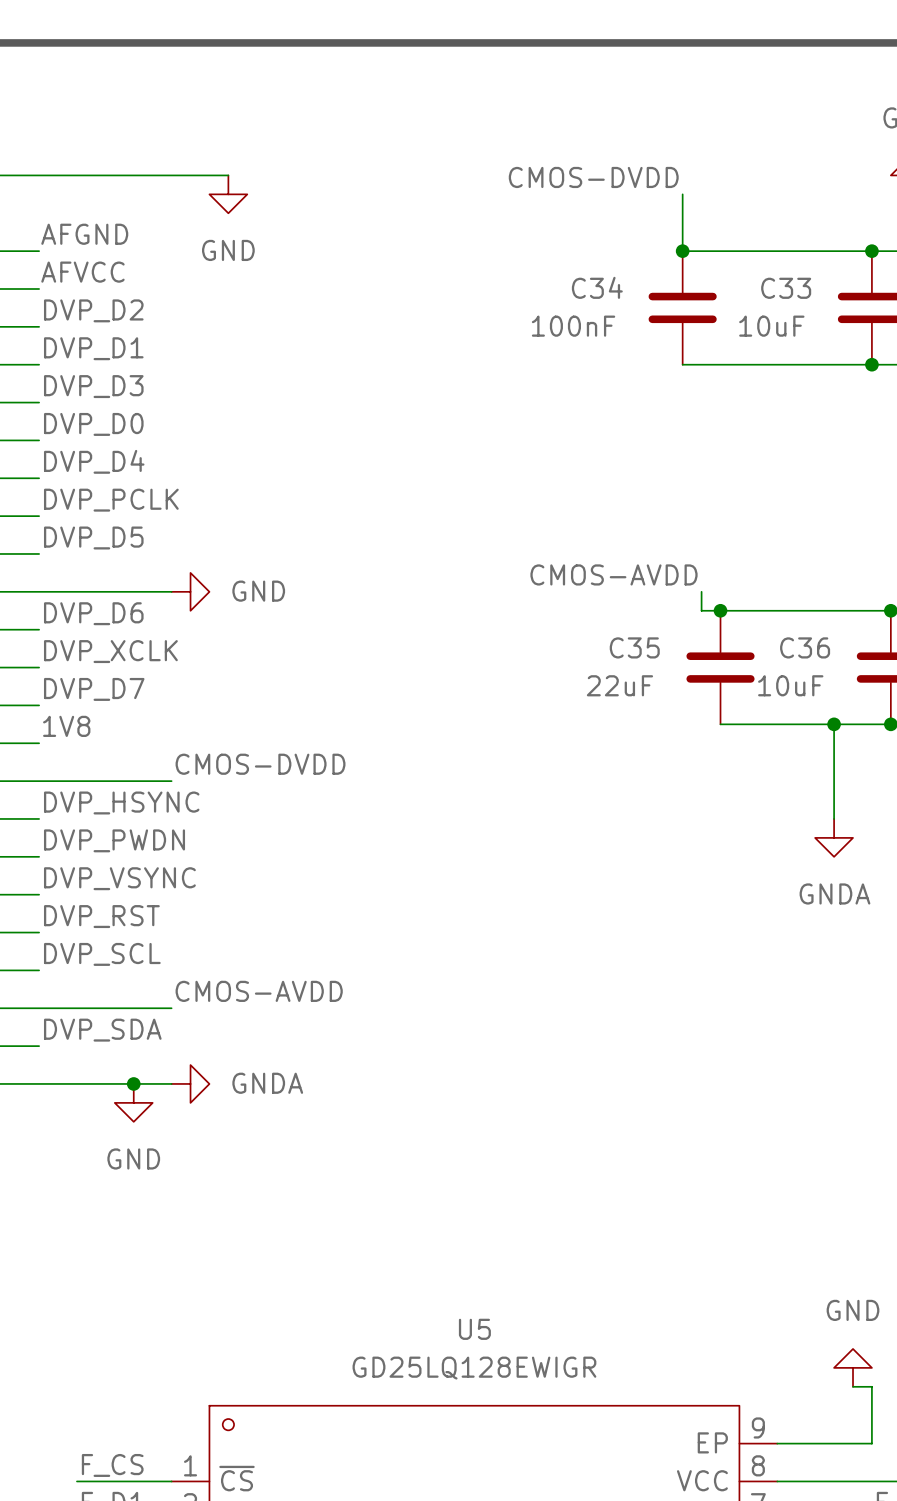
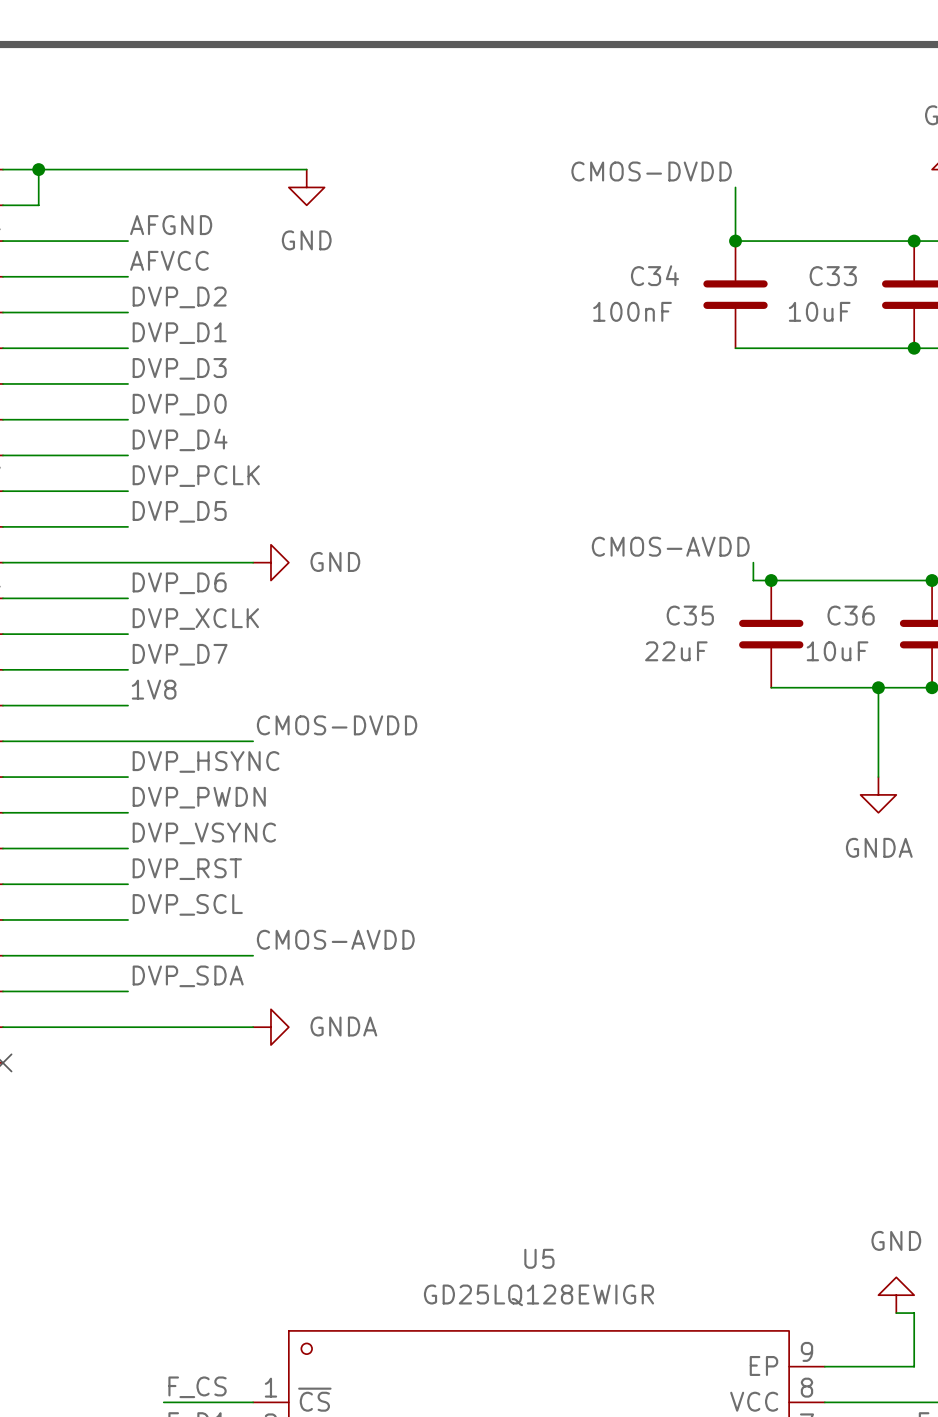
junction: (133, 1083) -> none
power symbol: GND (133, 1102) -> none

